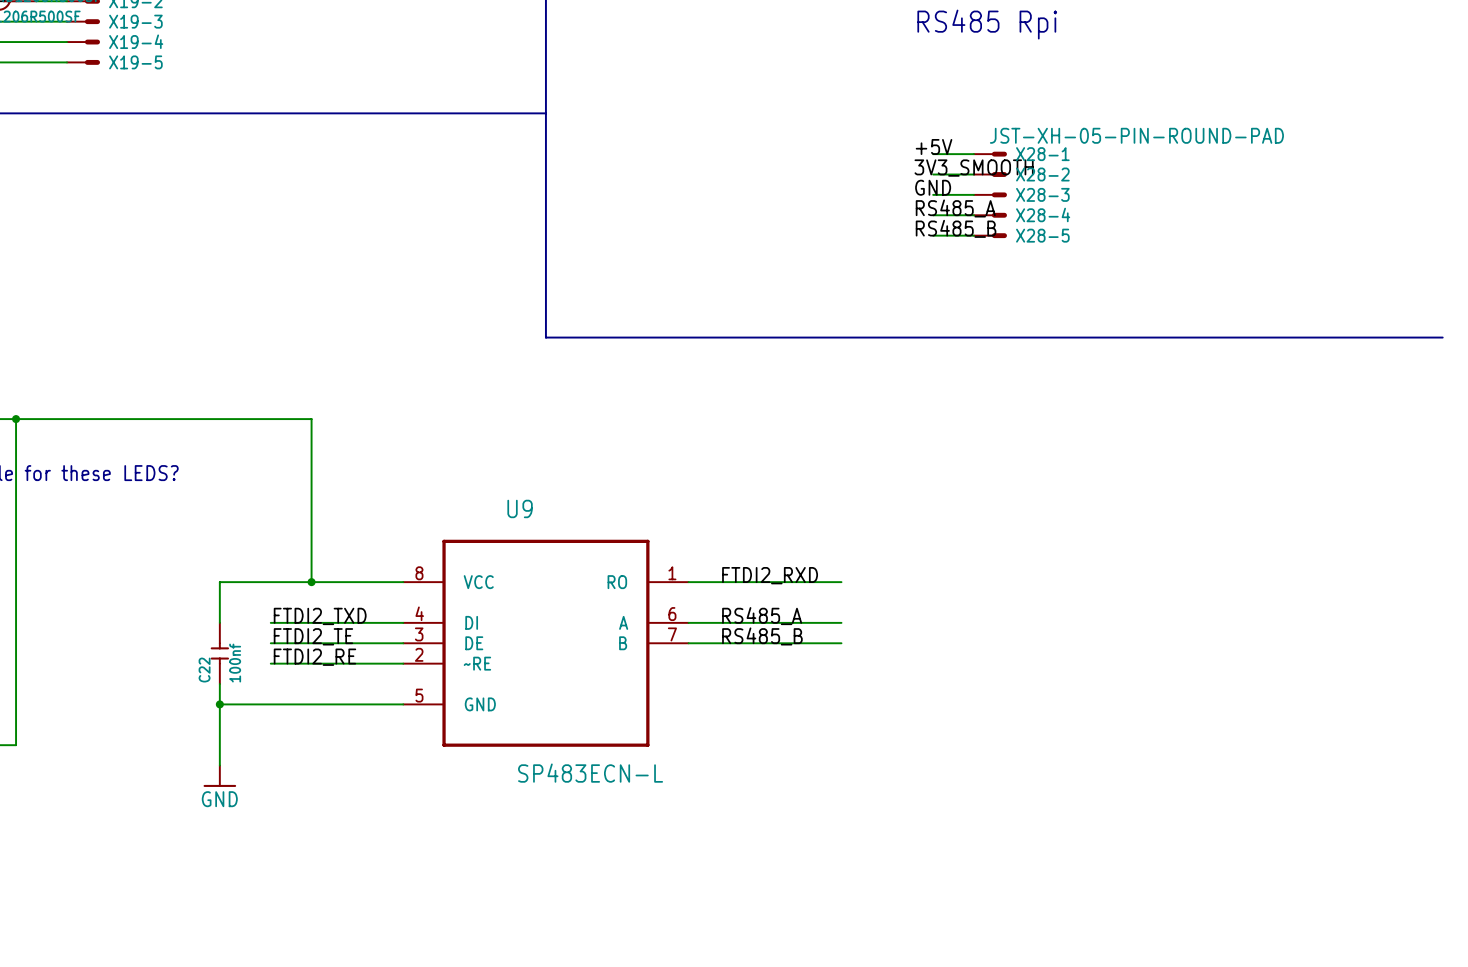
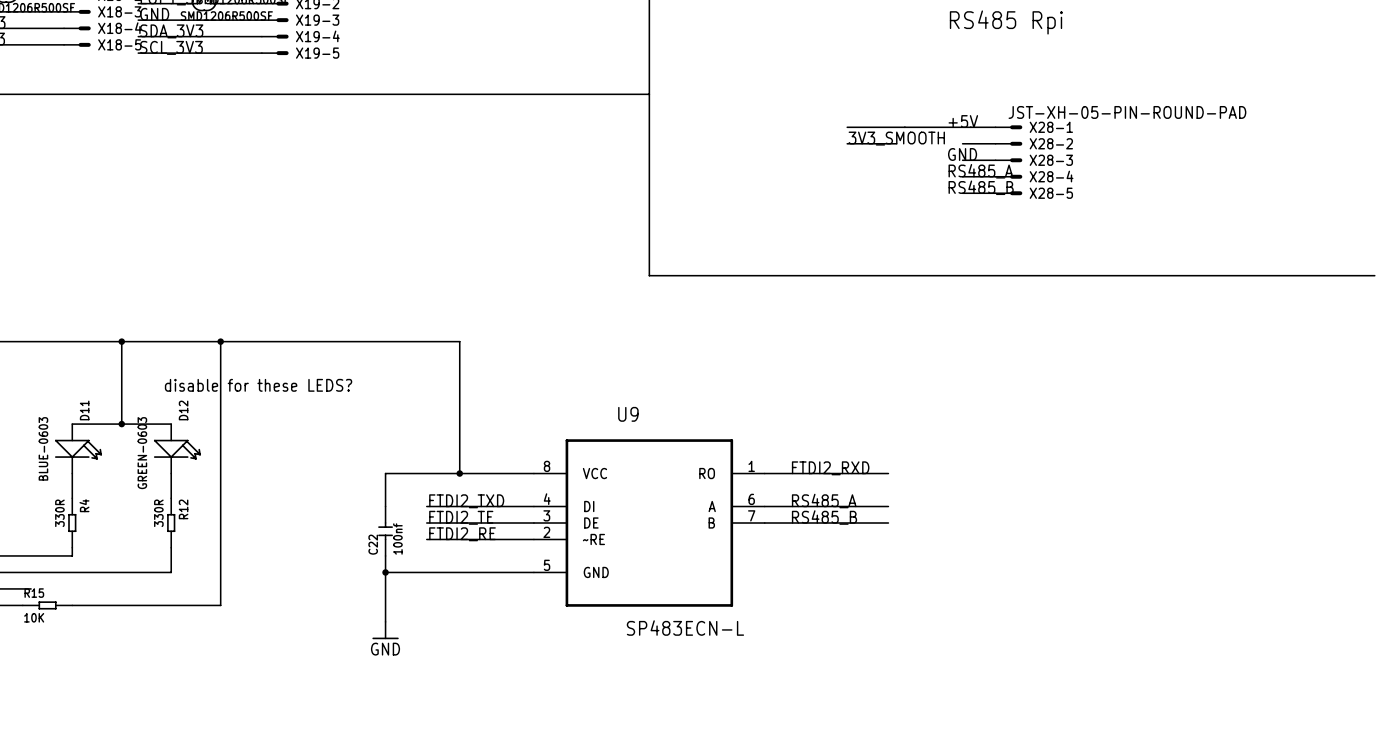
wire: none -> (847, 127) (962, 127)
label position: 3V3_SMOOTH (974, 168) -> 3V3_SMOOTH (896, 138)
wire: none -> (847, 143) (896, 143)

